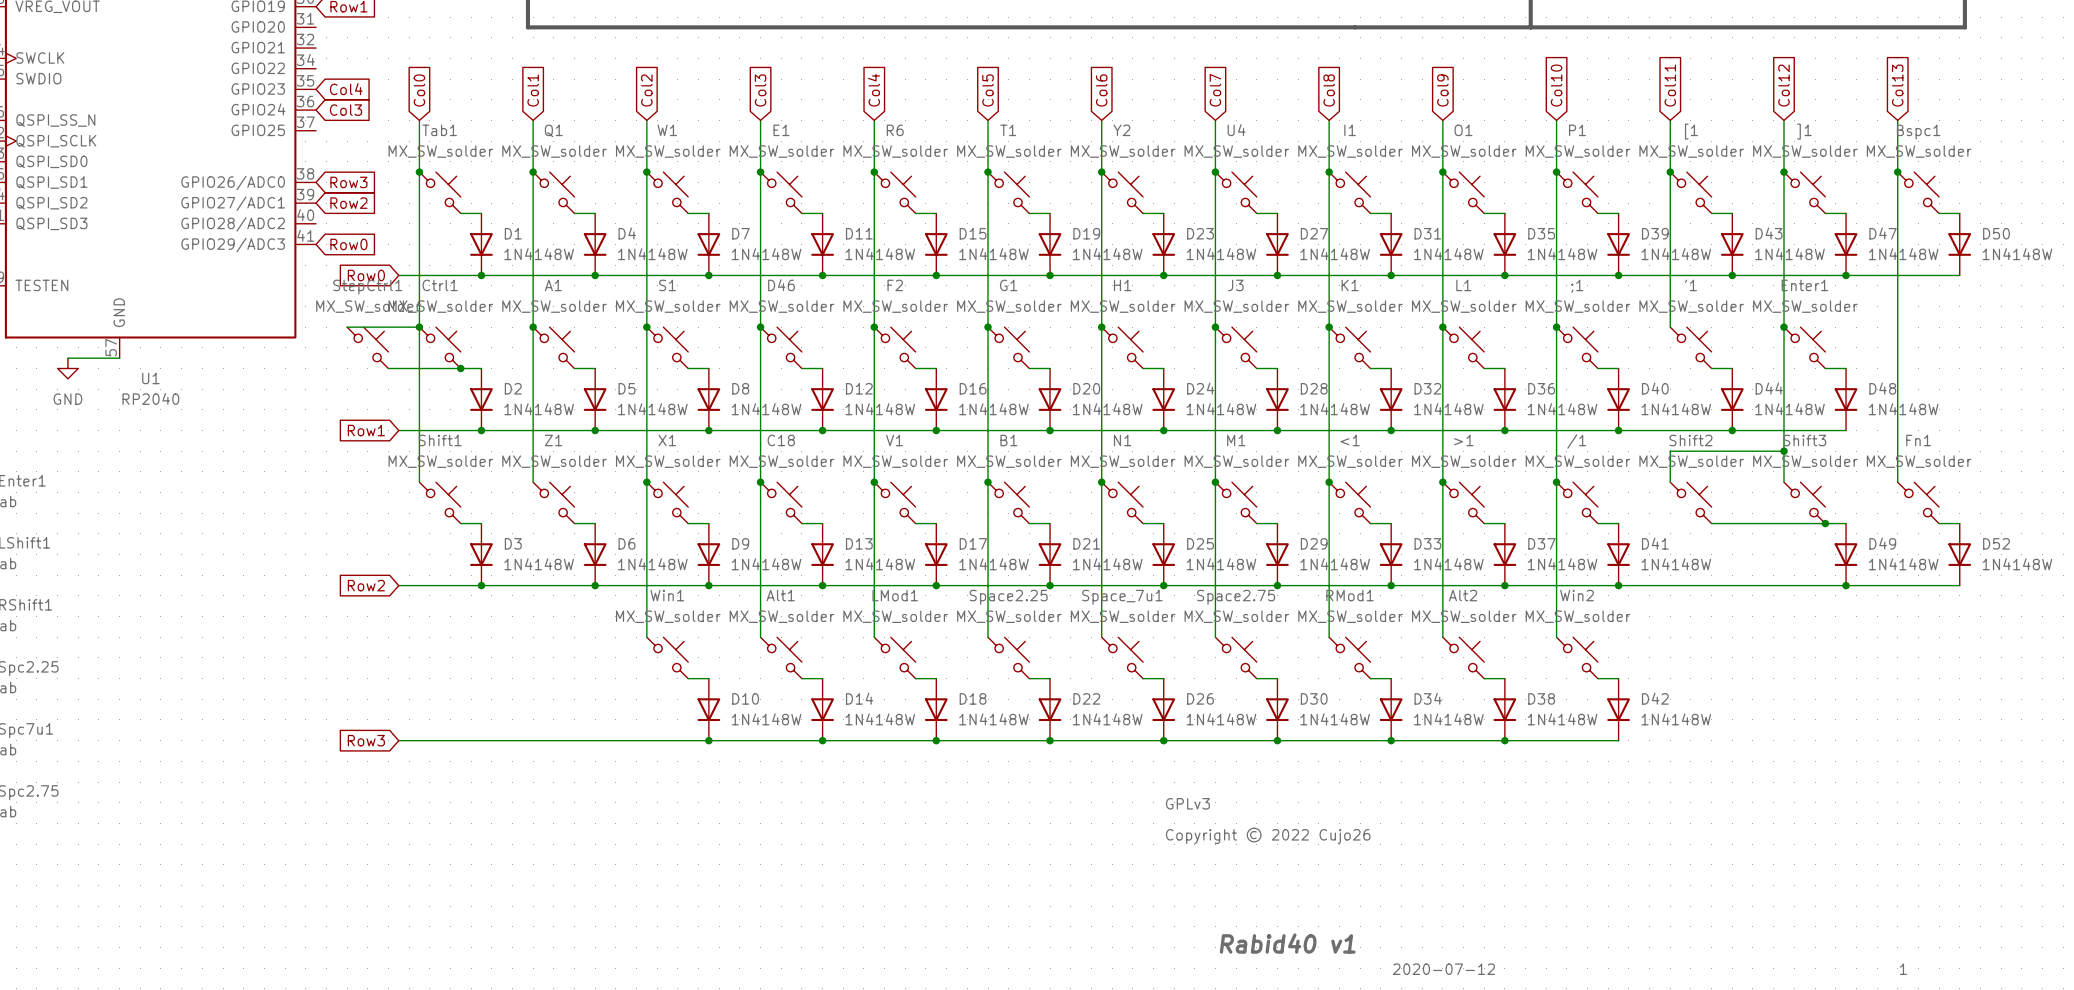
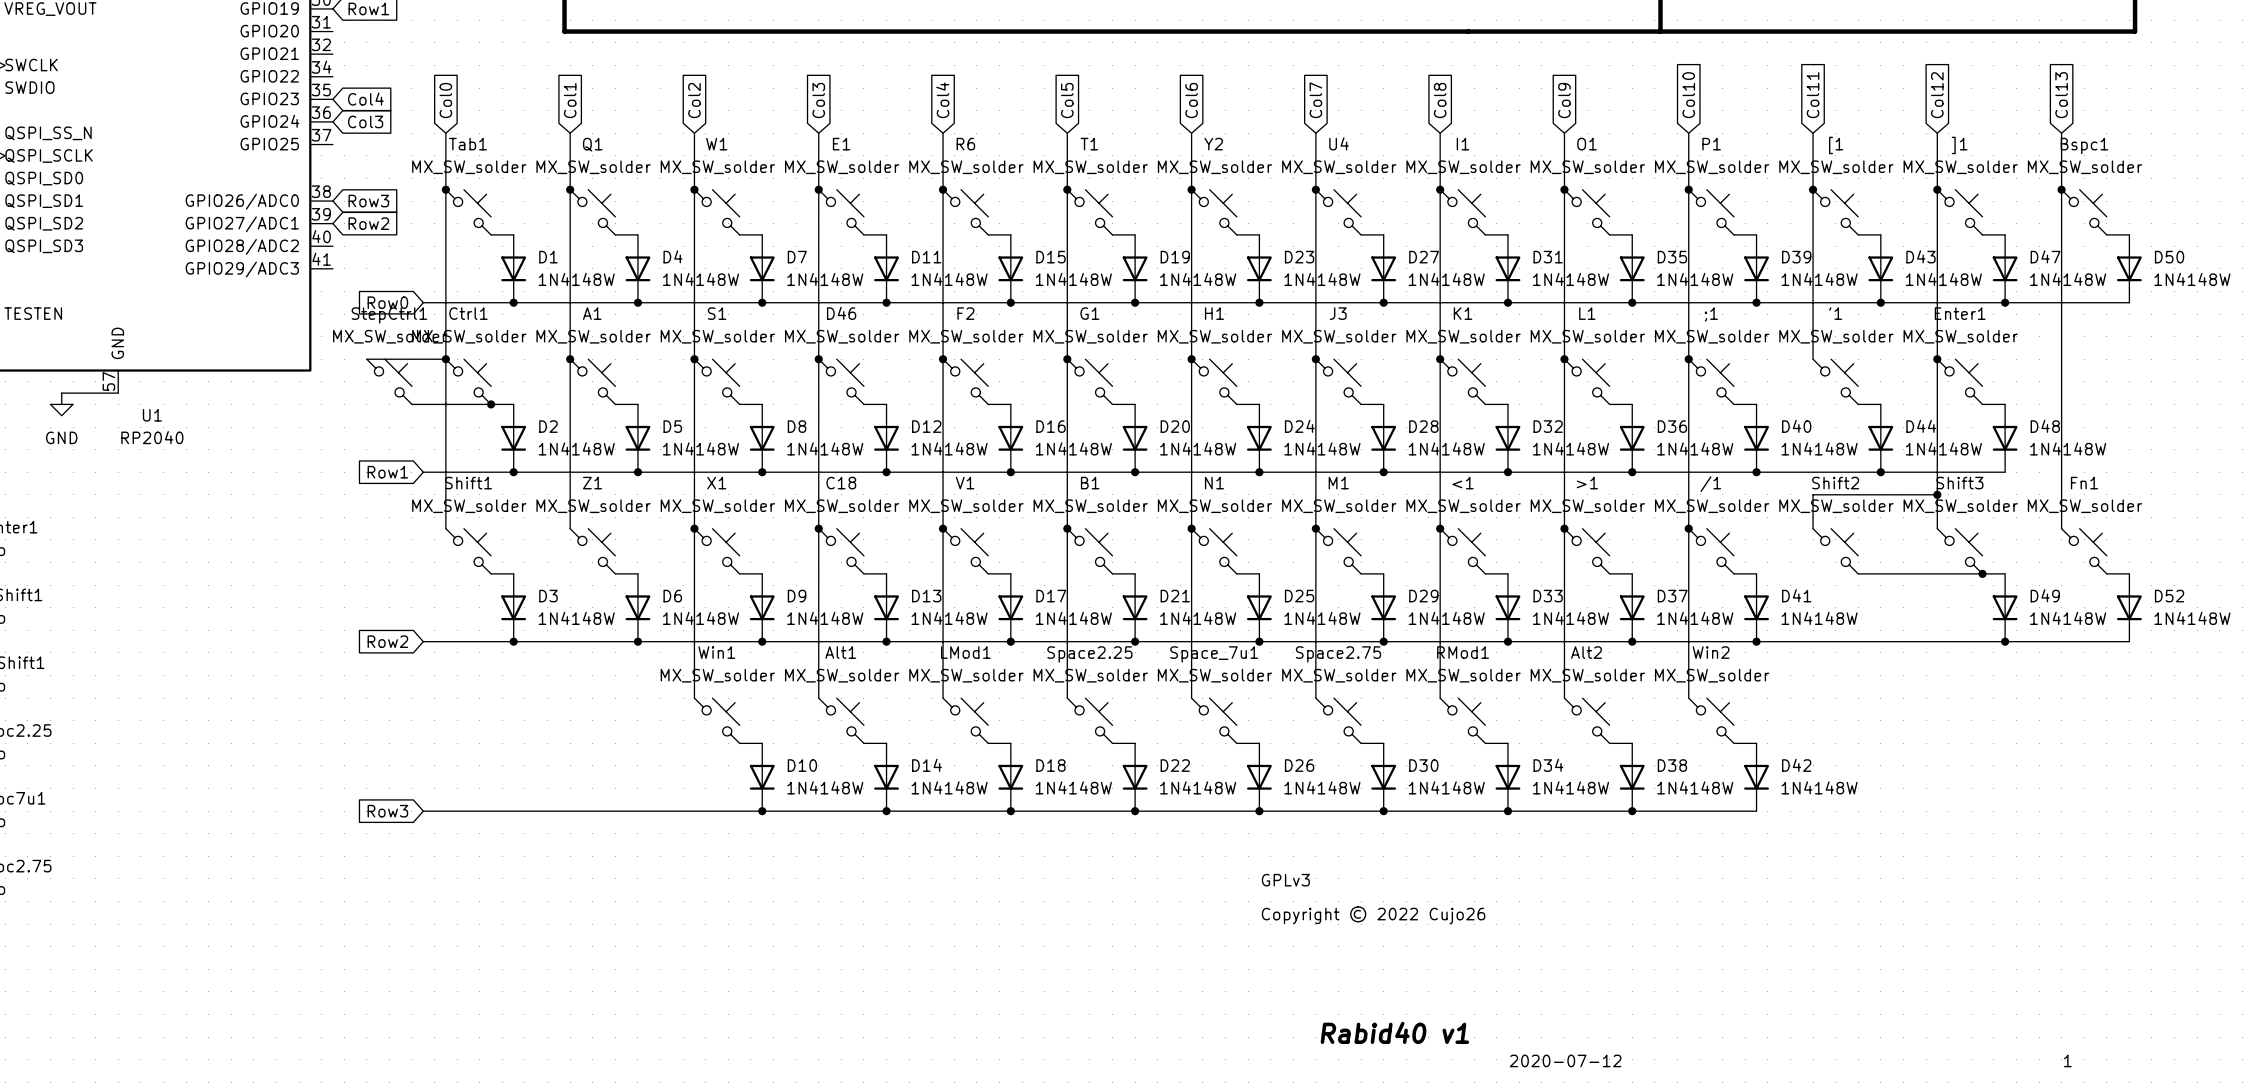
global label: Row0 (348, 244) -> none

